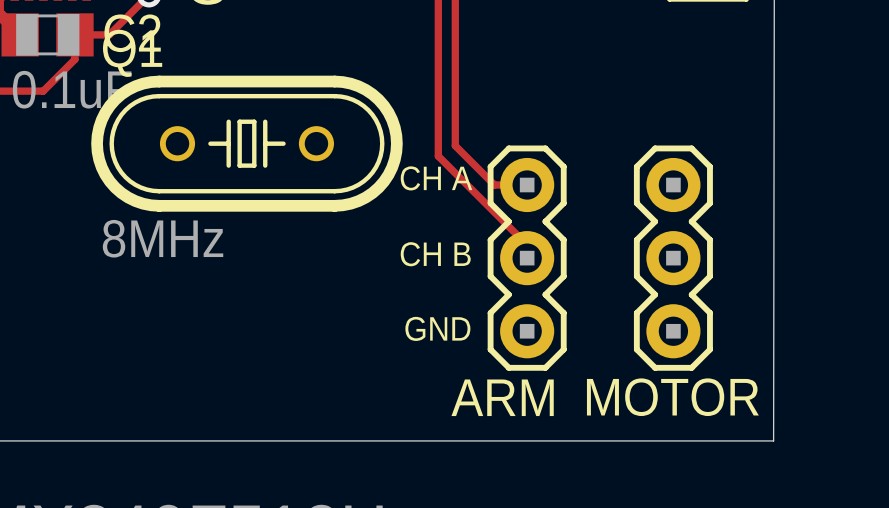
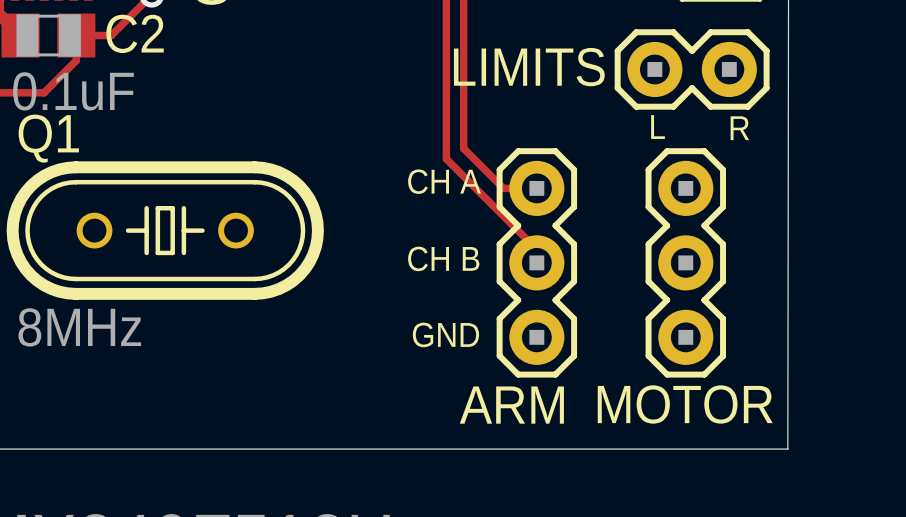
LIMITS: none -> (692, 69)
text: none -> L (658, 127)
text: none -> R (739, 128)
Q1 position: (246, 143) -> (165, 230)

